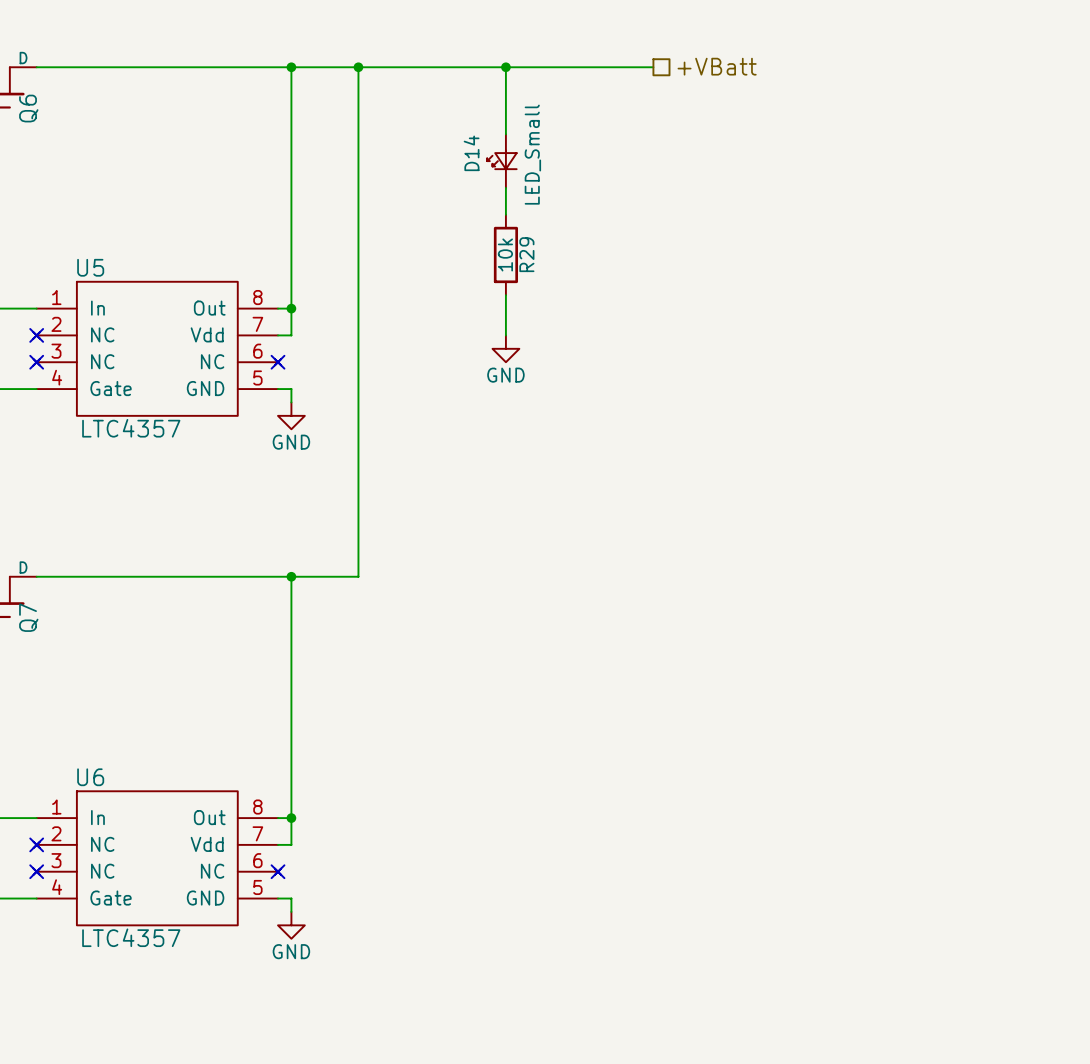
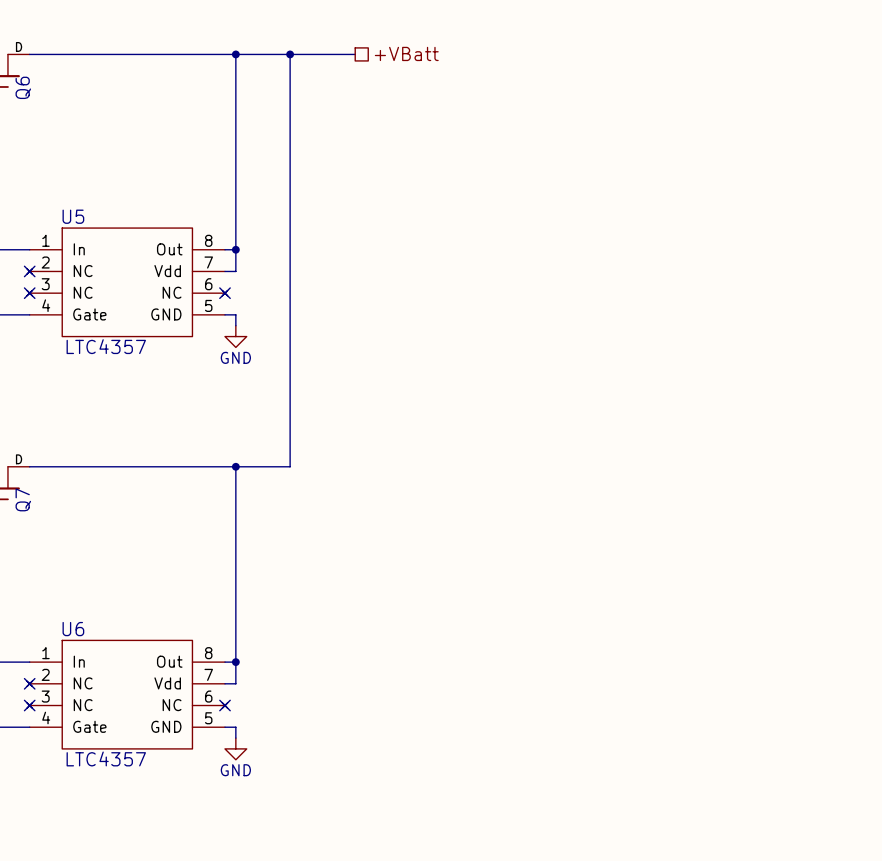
hierarchical label position: +VBatt (717, 66) -> +VBatt (406, 53)
wire: (438, 67) (653, 67) -> none
wire: (505, 67) (505, 134) -> none
junction: (505, 67) -> none
D14: LED_Small (501, 161) -> none
wire: (505, 187) (505, 214) -> none
R29: 10k (505, 254) -> none
wire: (505, 295) (505, 335) -> none
power symbol: GND (505, 348) -> none

